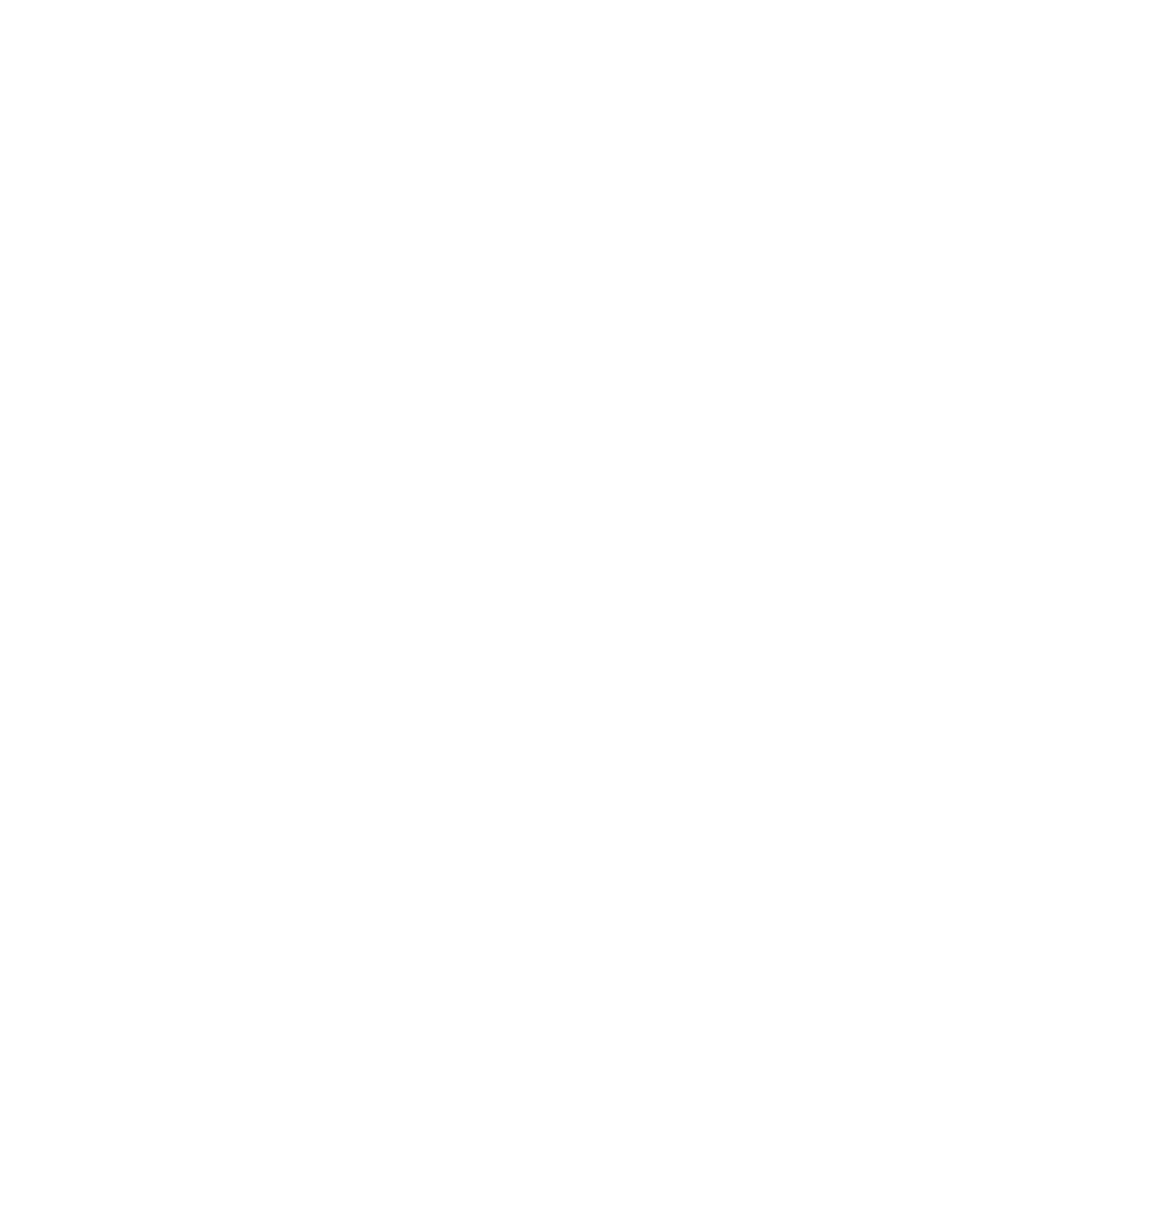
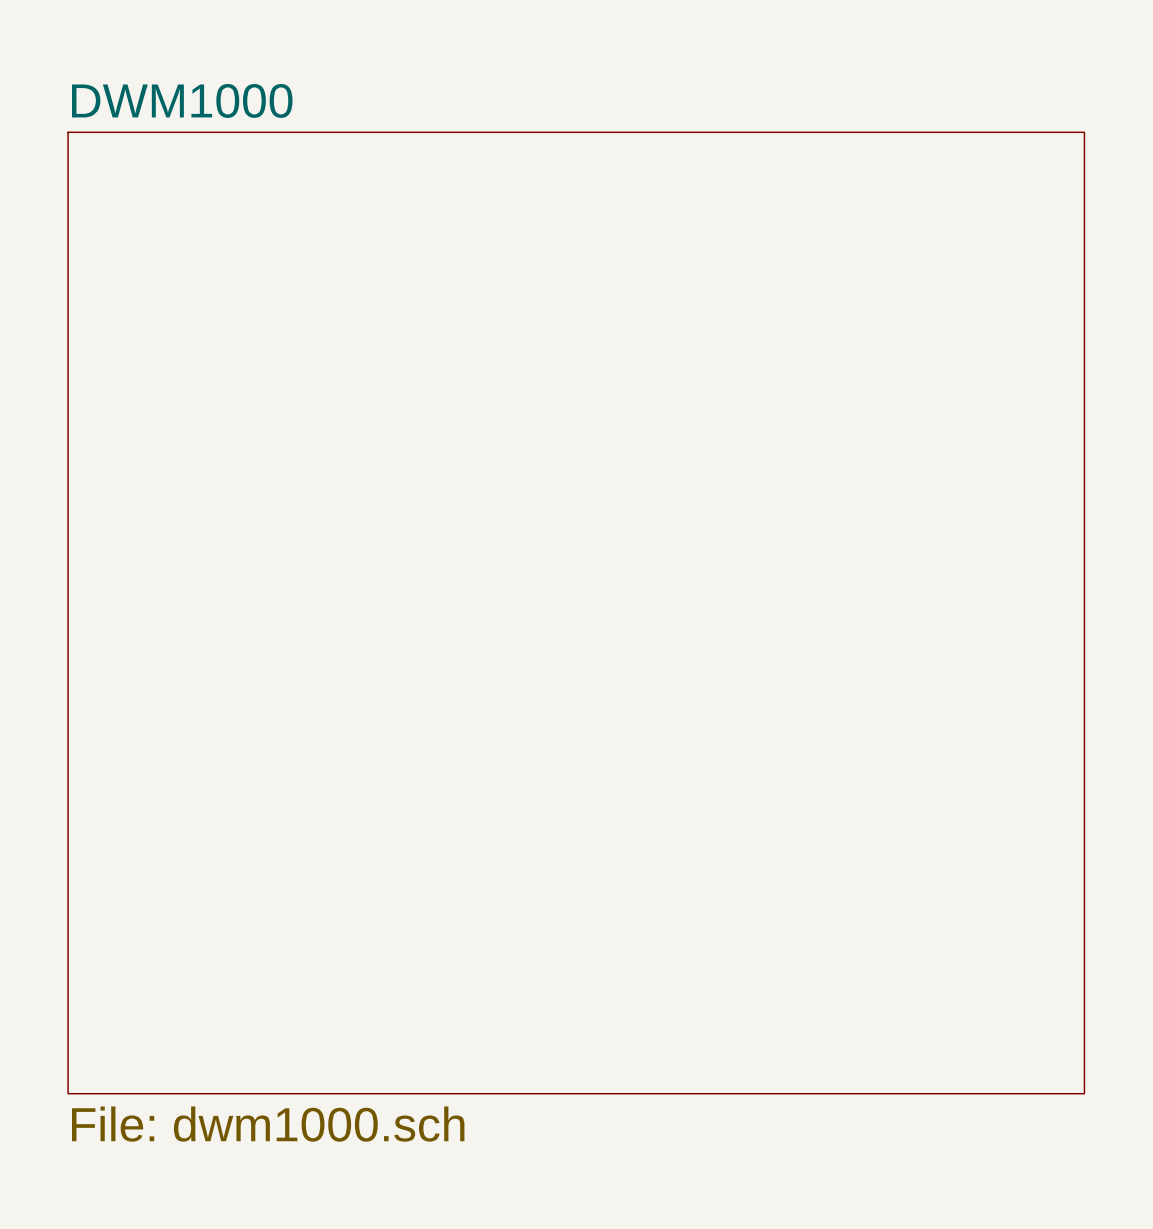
sheet DWM1000: none -> File: dwm1000.sch (576, 613)

